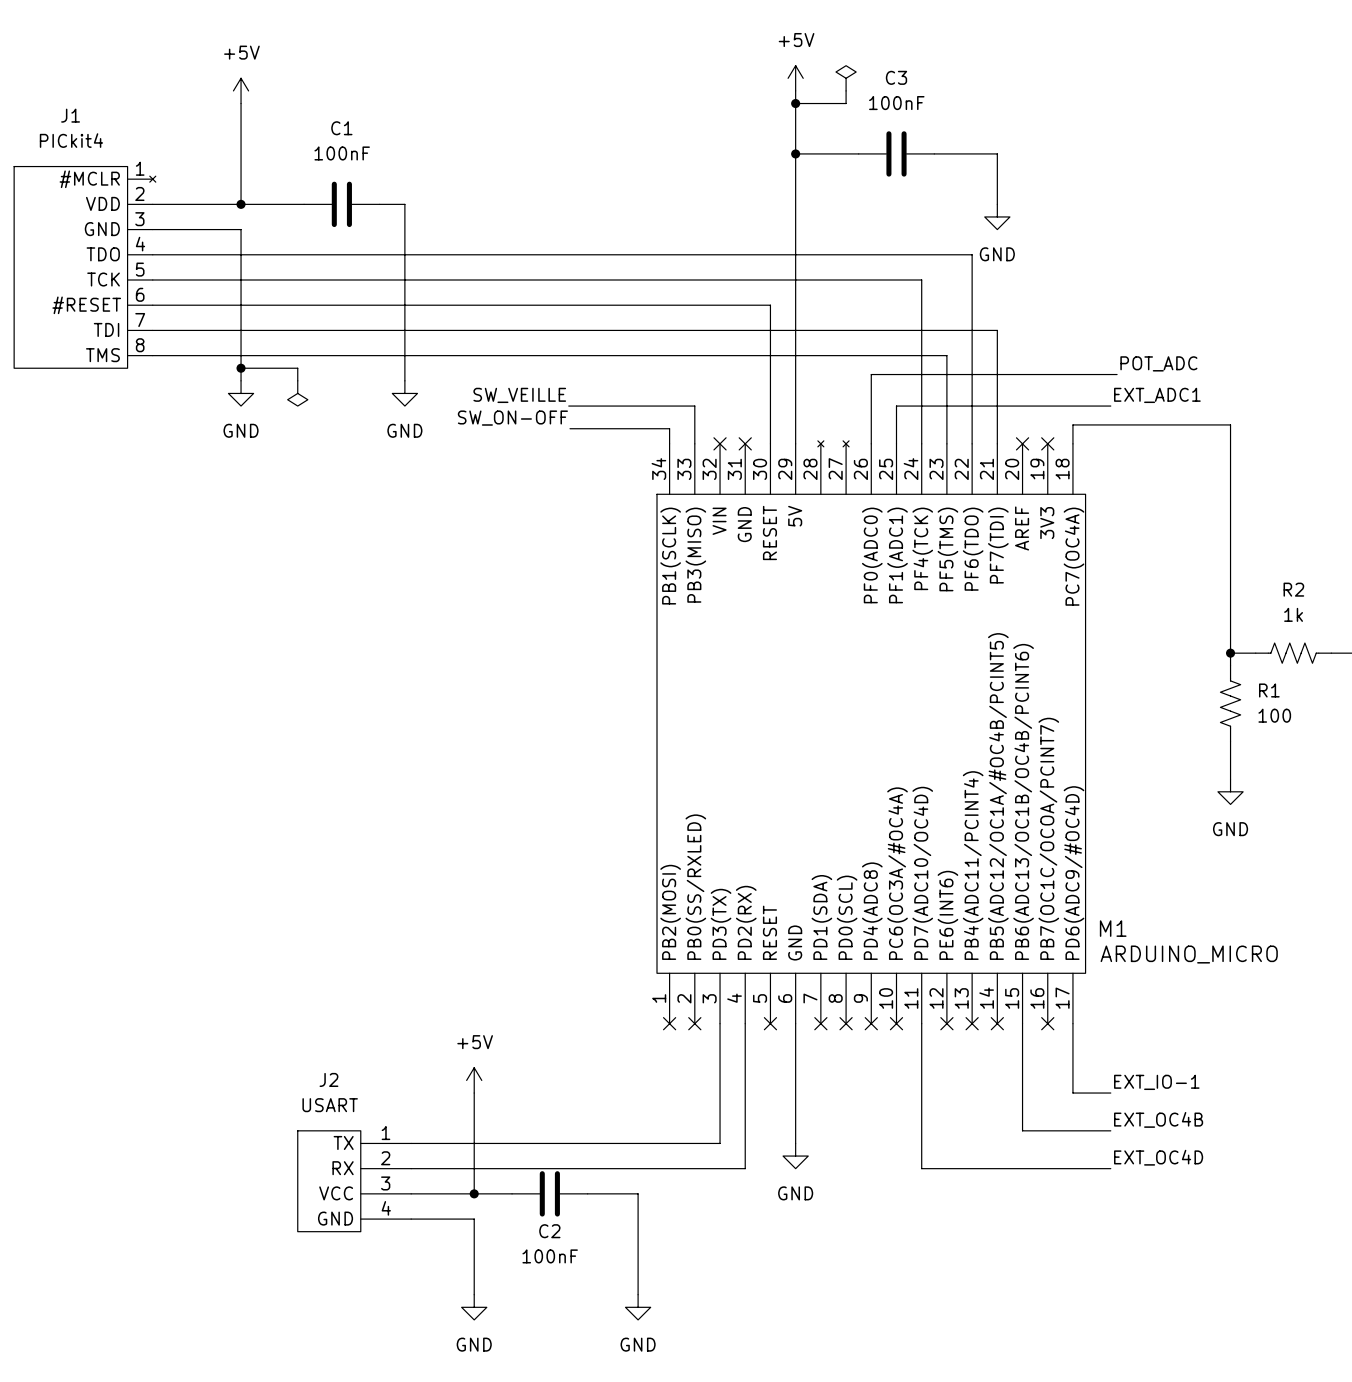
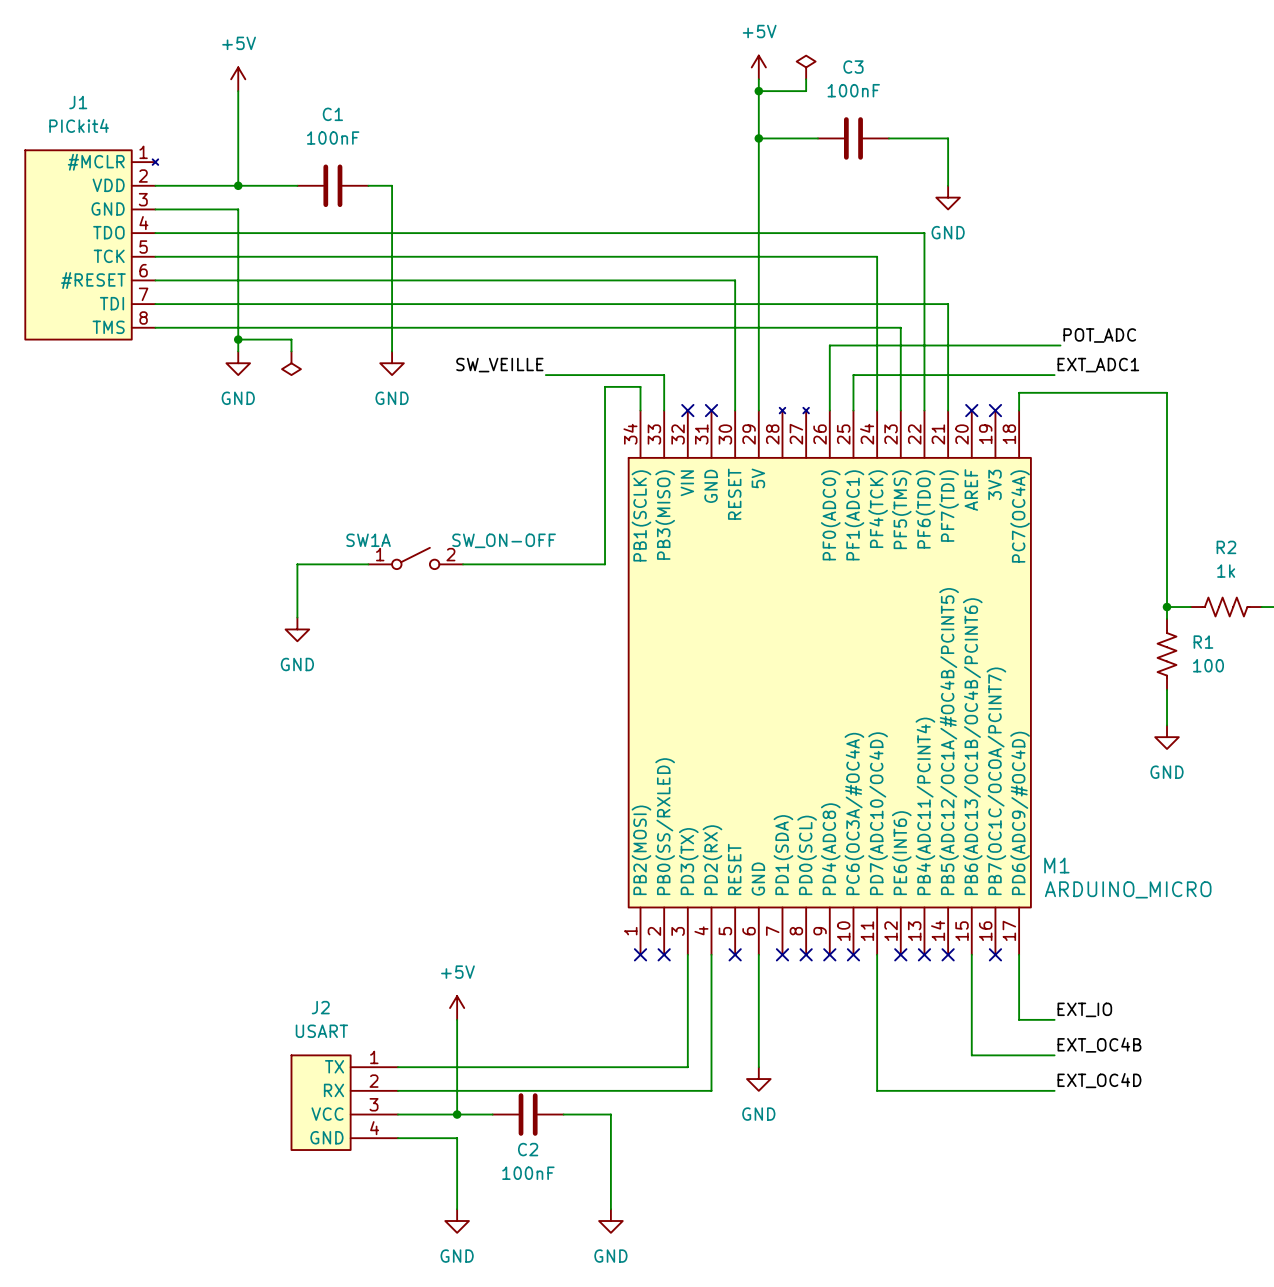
label: SW_ON-OFF (512, 418) -> none
wire: (570, 428) (669, 428) -> (463, 564) (605, 564) (605, 386) (640, 386) (640, 396)
SW1A: none -> SW_ON-OFF (415, 558)
wire: none -> (368, 564) (297, 564) (297, 617)
power symbol: none -> GND (297, 629)
label: EXT_IO-1 (1156, 1082) -> EXT_IO (1084, 1009)

